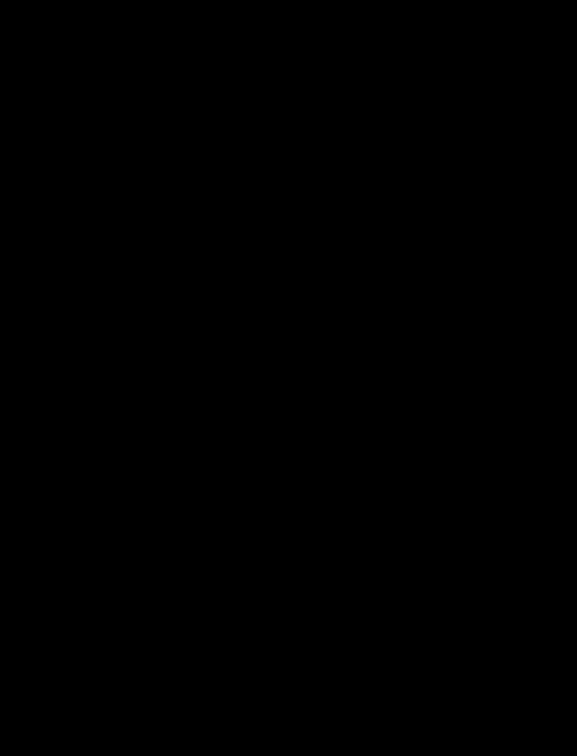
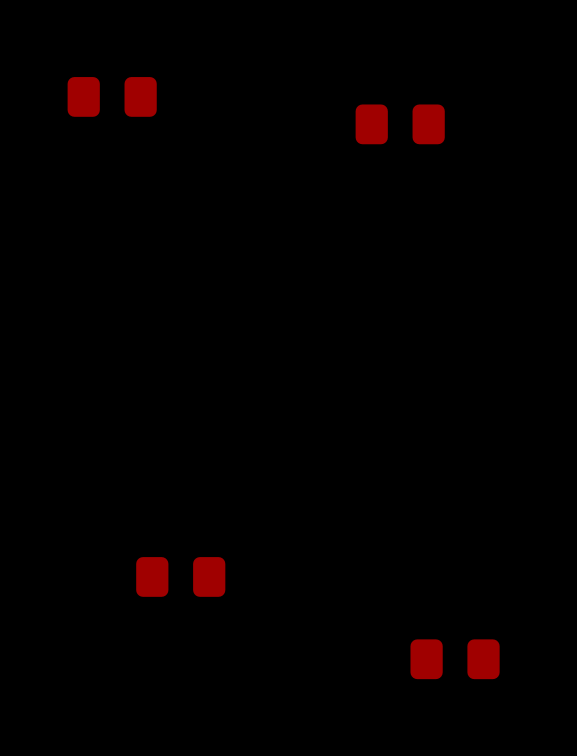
part: none -> (112, 96)
part: none -> (400, 124)
part: none -> (180, 576)
part: none -> (455, 659)

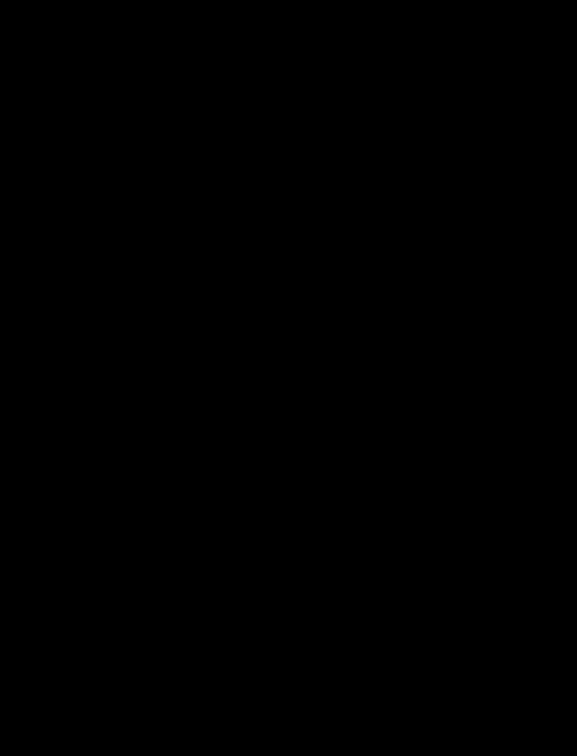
part: (112, 96) -> none
part: (400, 124) -> none
part: (180, 576) -> none
part: (455, 659) -> none

